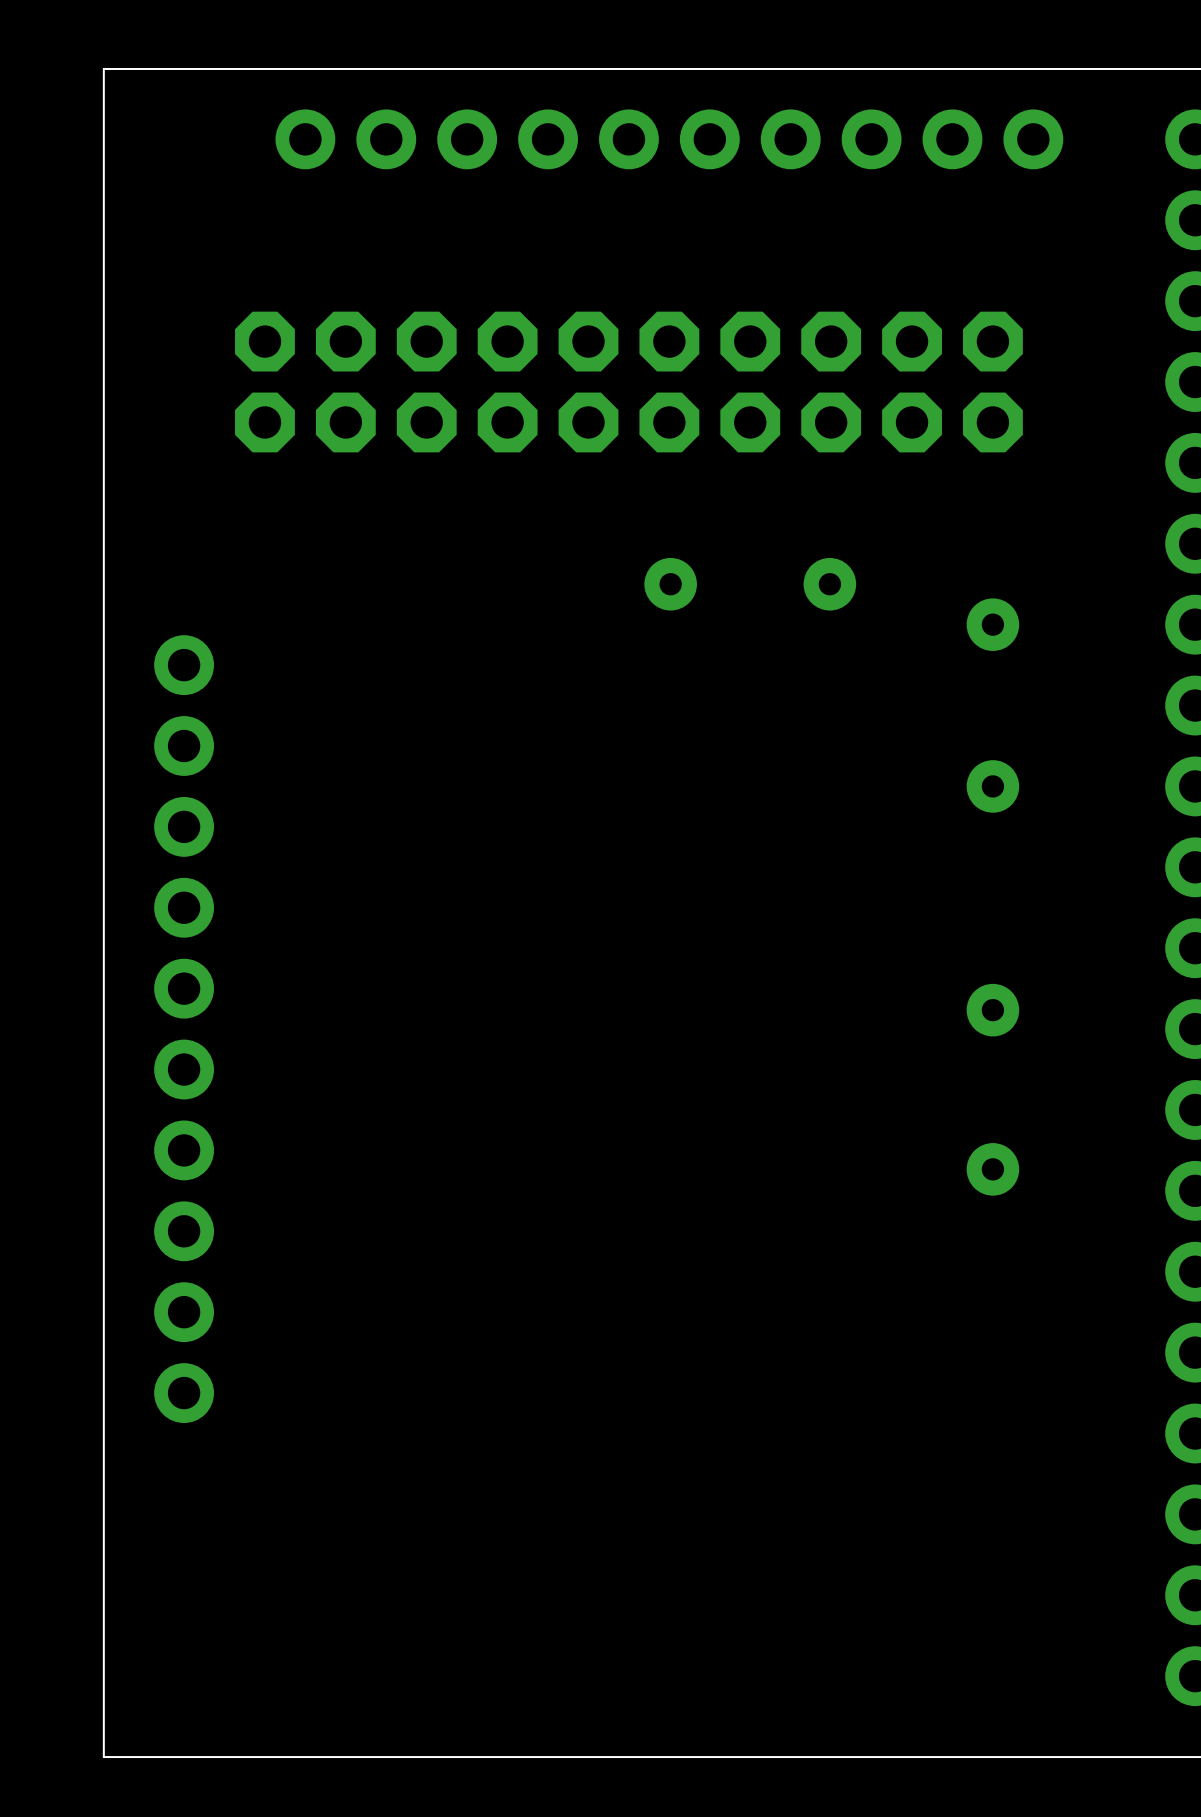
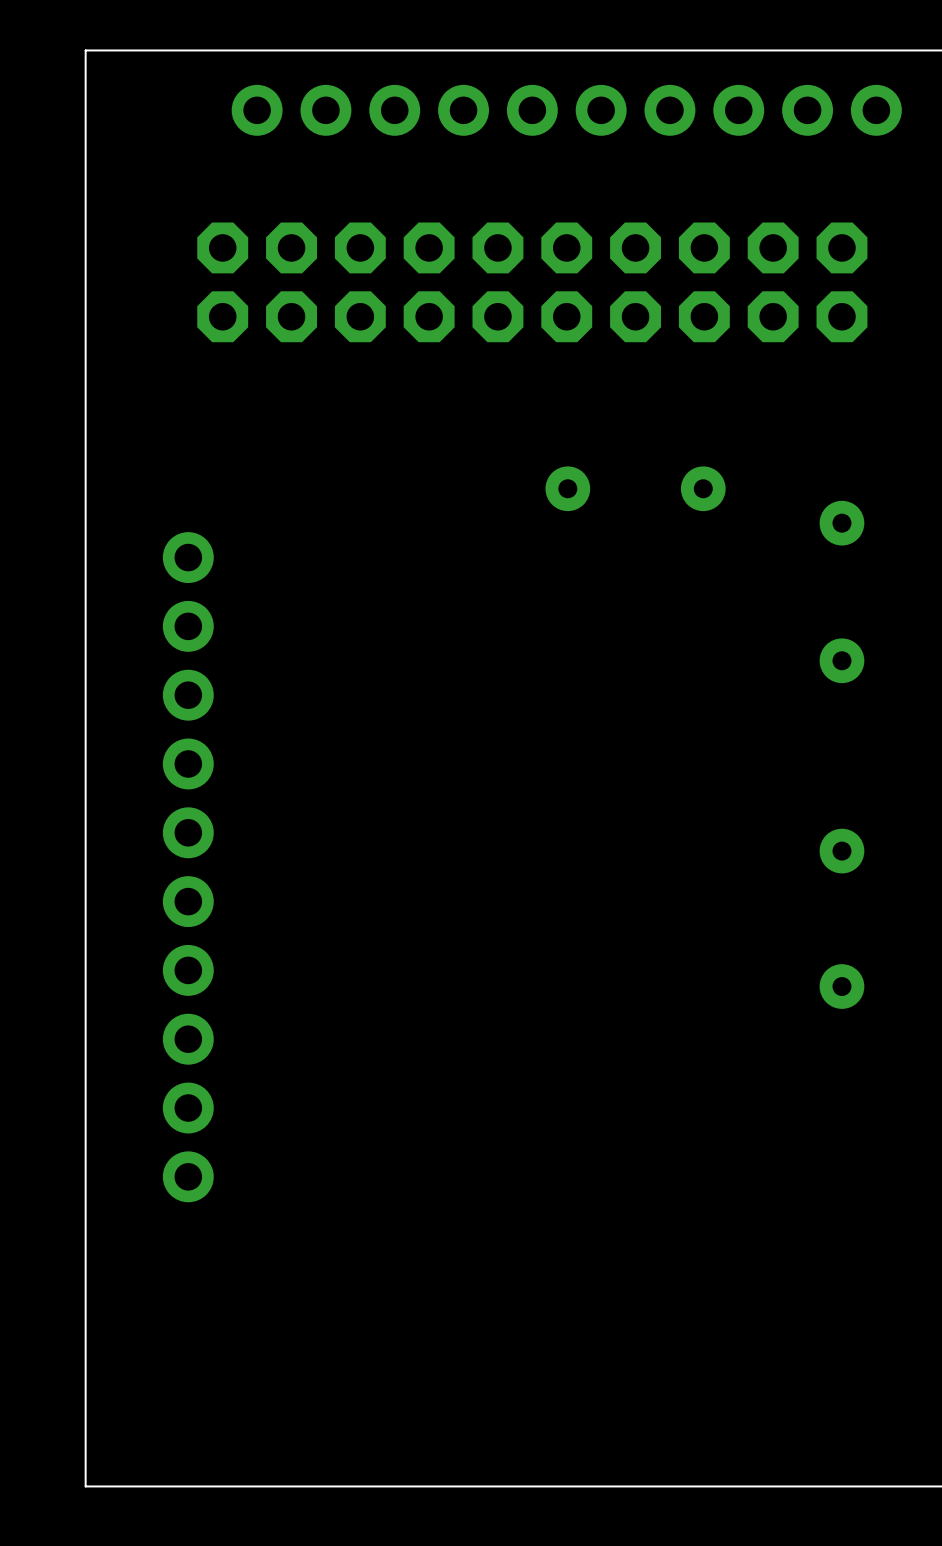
part position: (628, 382) -> (532, 282)
part position: (184, 1029) -> (188, 867)

